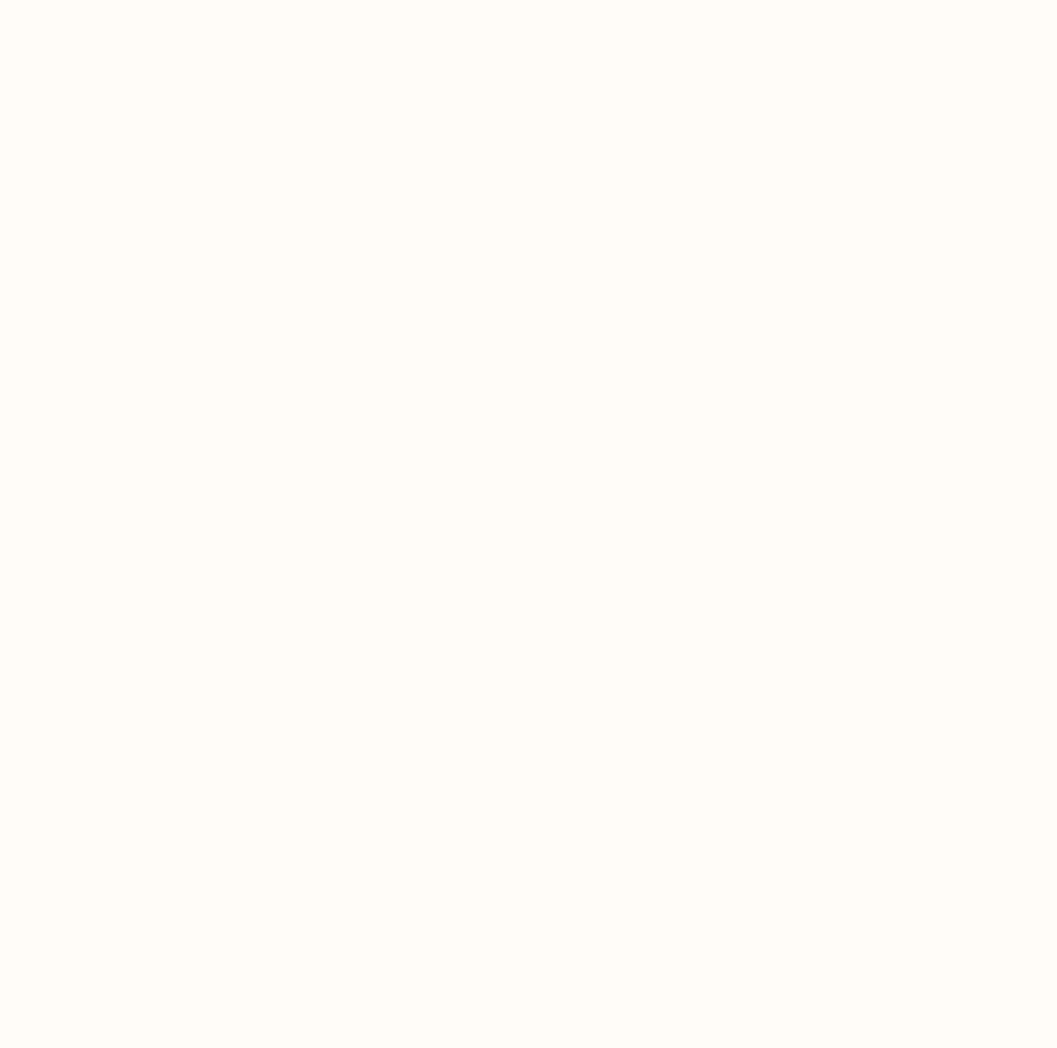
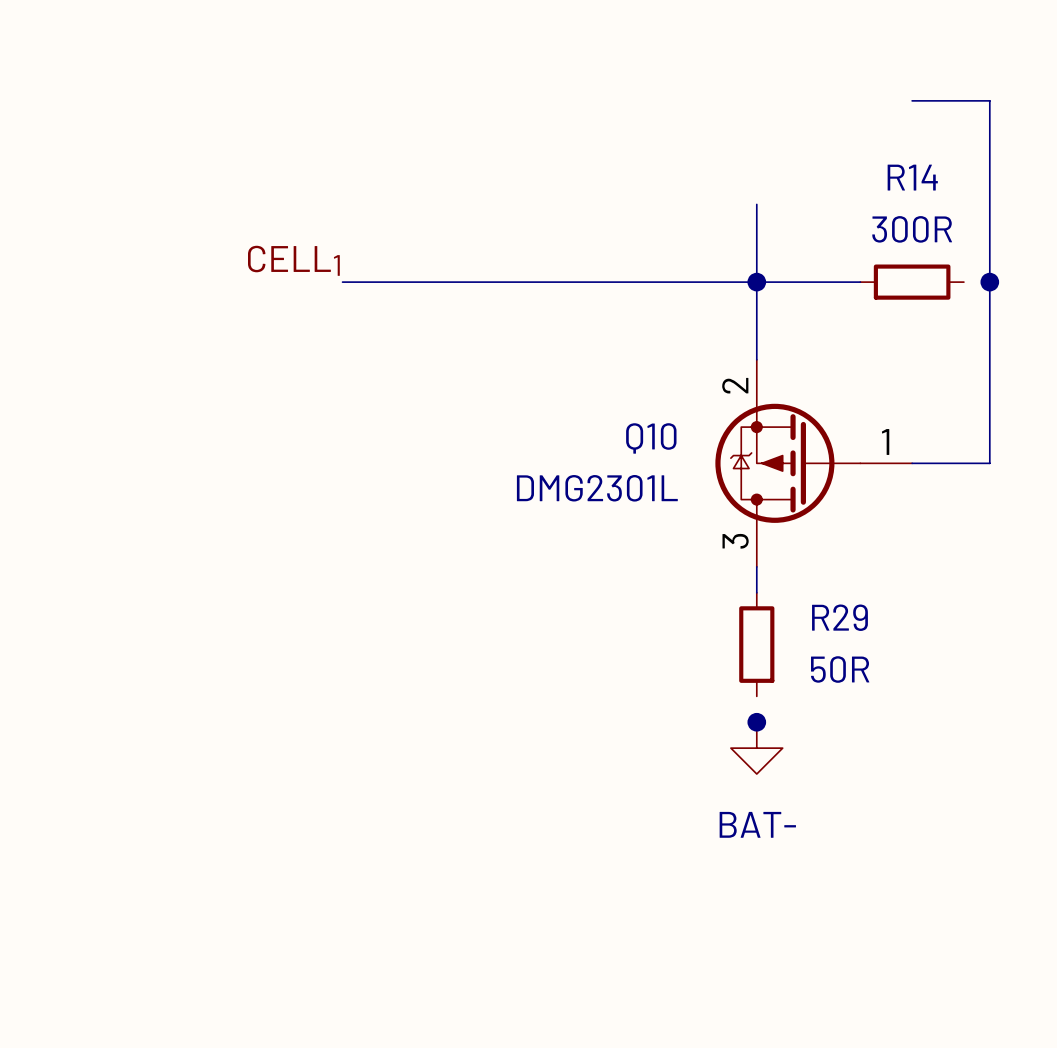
wire: none -> (912, 100) (989, 100) (989, 463) (912, 463)
wire: none -> (756, 204) (756, 359)
label: none -> CELL1 (293, 260)
wire: none -> (342, 282) (860, 282)
junction: none -> (756, 282)
R14: none -> (912, 282)
junction: none -> (989, 282)
Q10: none -> DMG2301L (813, 463)
wire: none -> (756, 566) (756, 592)
R29: none -> (756, 644)
junction: none -> (756, 722)
power symbol: none -> BAT- (756, 748)

